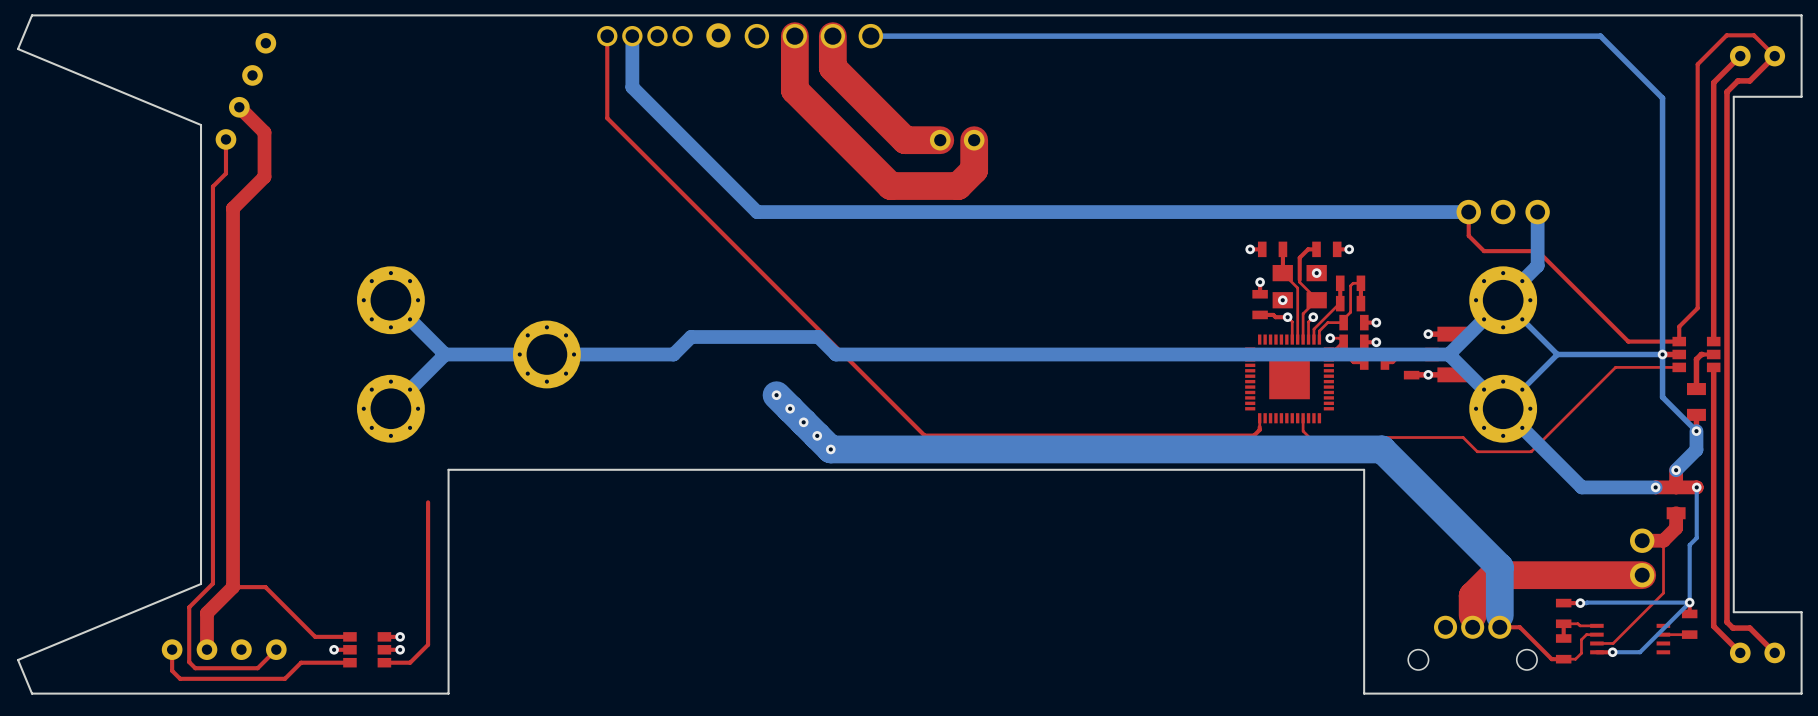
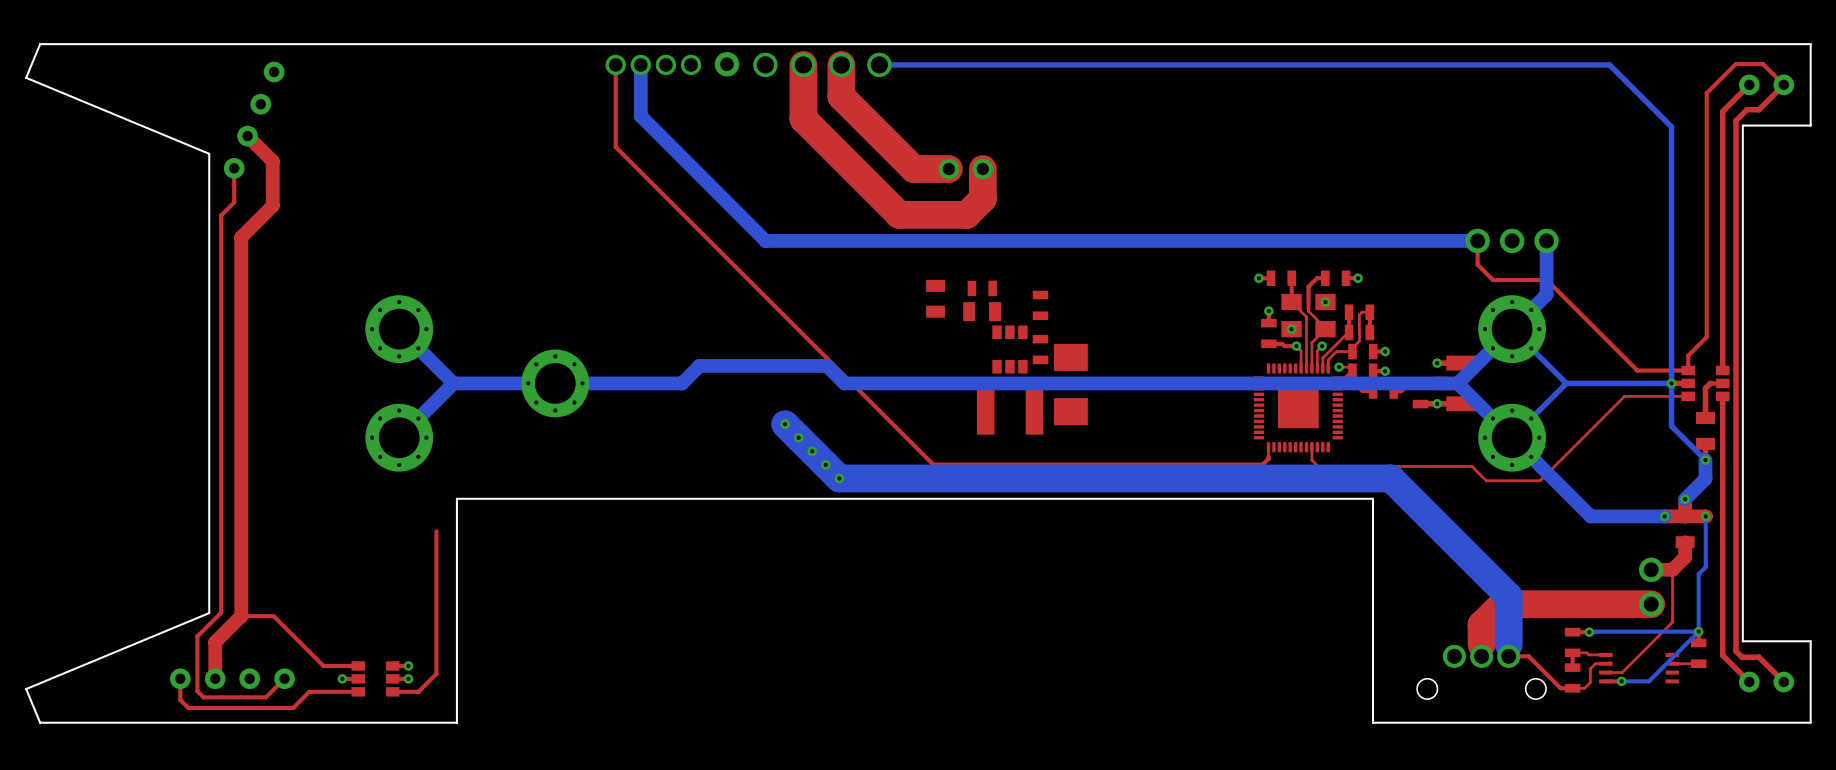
part: none -> (982, 288)
part: none -> (935, 298)
part: none -> (1040, 305)
part: none -> (982, 311)
part: none -> (1009, 349)
part: none -> (1040, 349)
part: none -> (1070, 384)
part: none -> (1010, 411)

